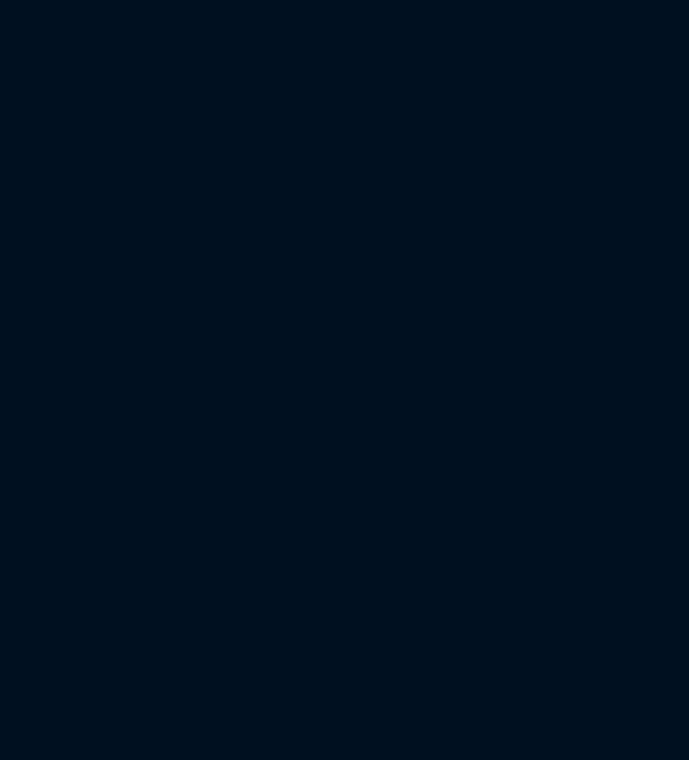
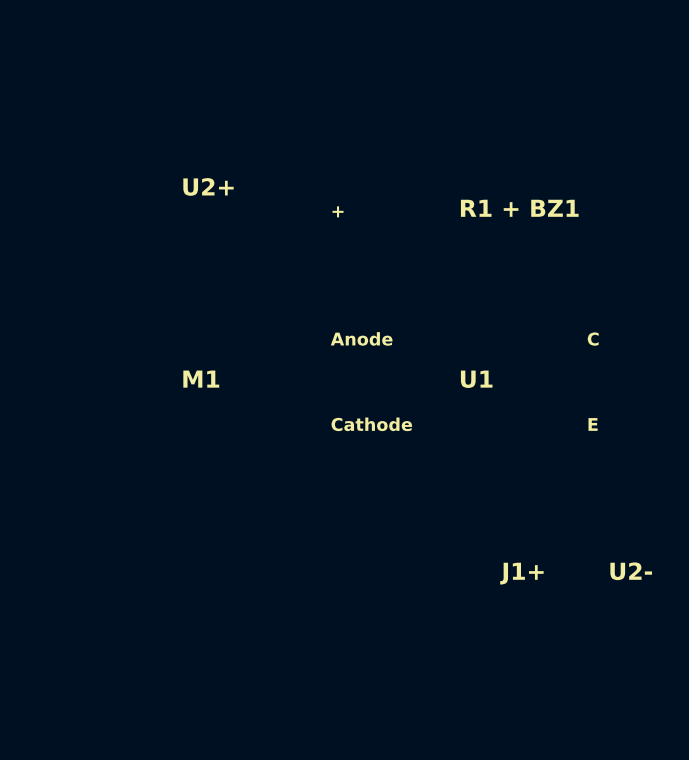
text: none -> U2+ (208, 186)
text: none -> R1 + BZ1 (519, 208)
text: none -> + (338, 211)
text: none -> Anode (361, 338)
text: none -> C (593, 339)
text: none -> M1 (201, 379)
text: none -> U1 (476, 379)
text: none -> Cathode (371, 424)
text: none -> E (593, 424)
text: none -> U2- (631, 571)
text: none -> J1+ (521, 573)

